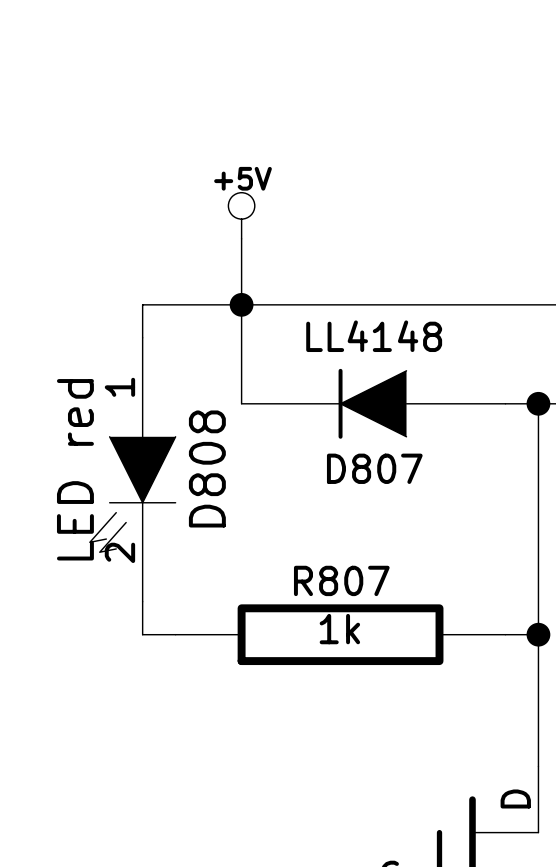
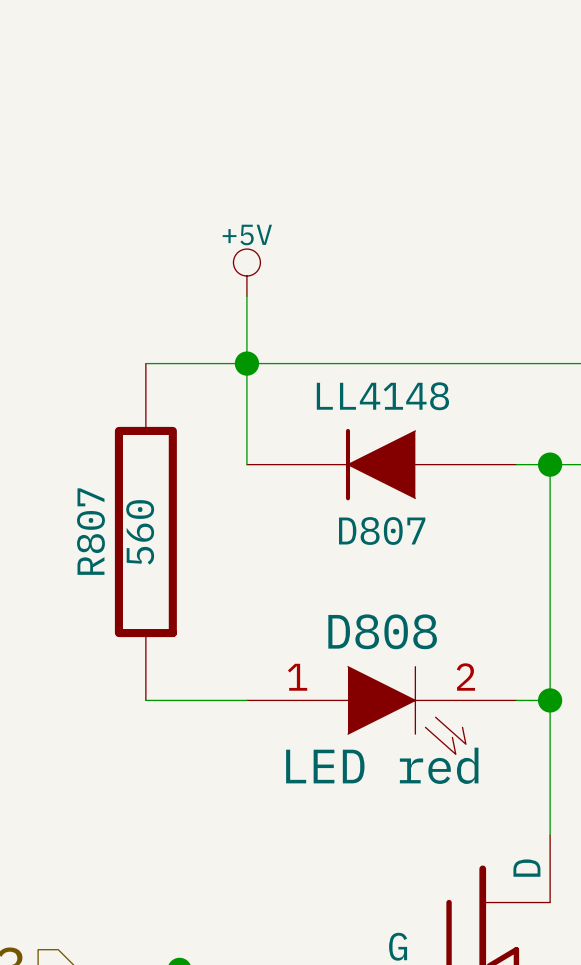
D808 position: (132, 469) -> (381, 710)
D808 rotation: 0° (132, 494) -> 90° counterclockwise (406, 710)
R807 name position: R807 (341, 580) -> R807 (90, 531)
R807 value: 1k (339, 629) -> 560 (140, 532)
R807 rotation: 0° (340, 634) -> 90° clockwise (145, 532)
R807 position: (340, 634) -> (145, 532)

